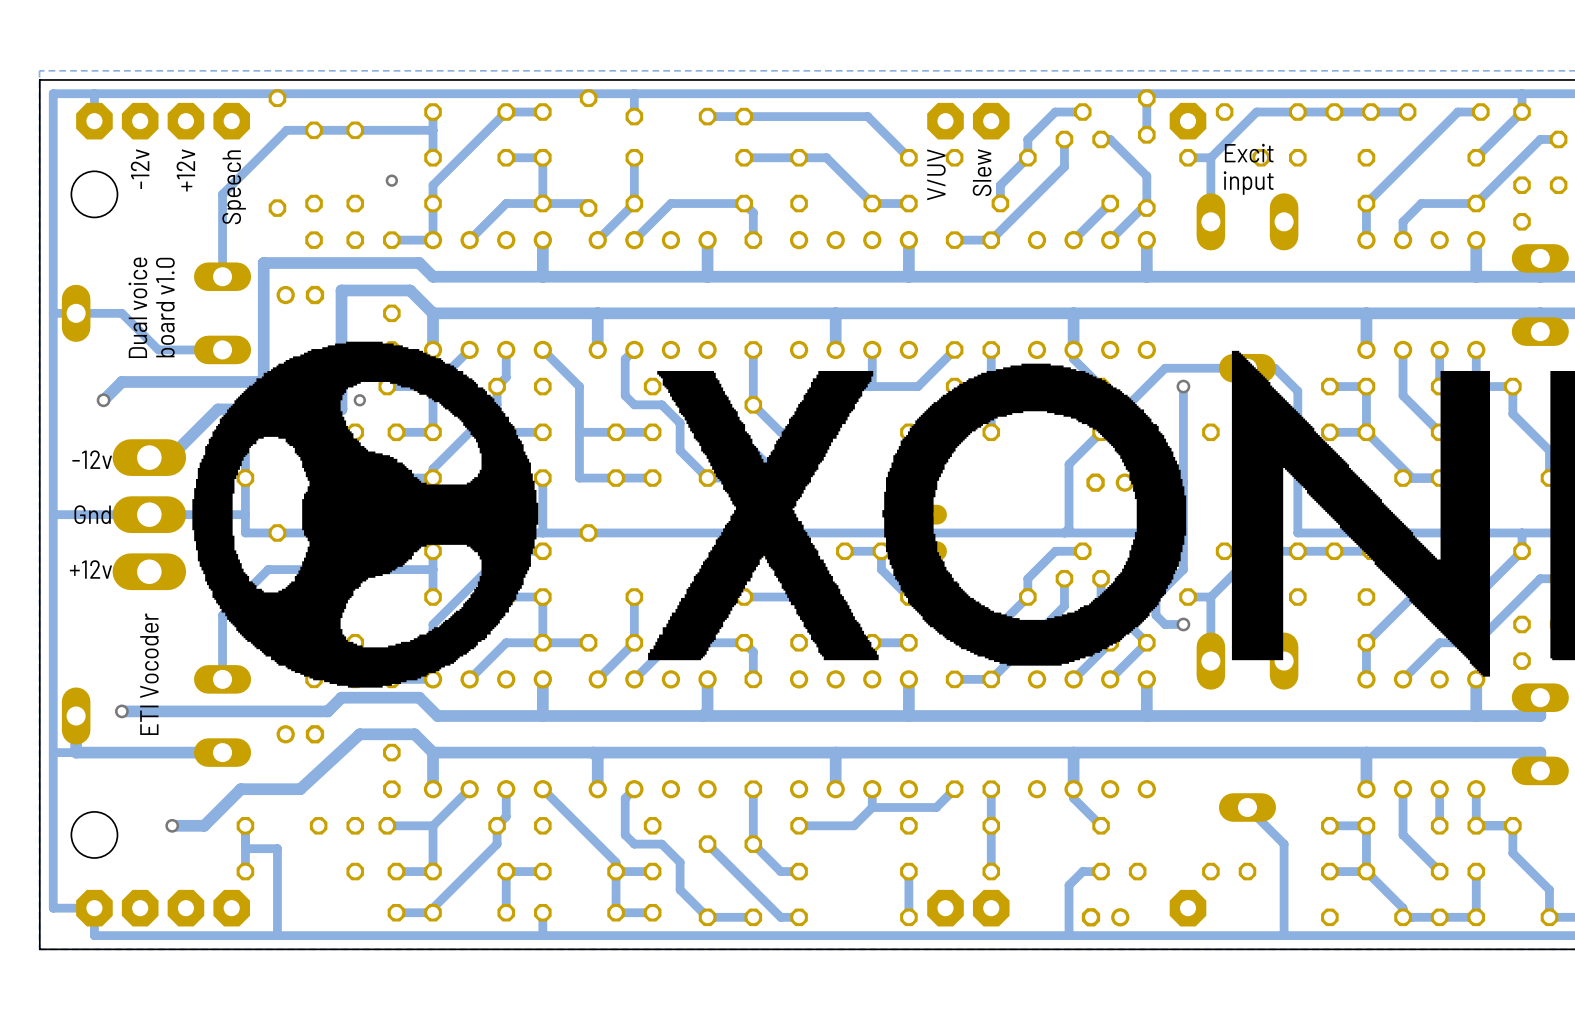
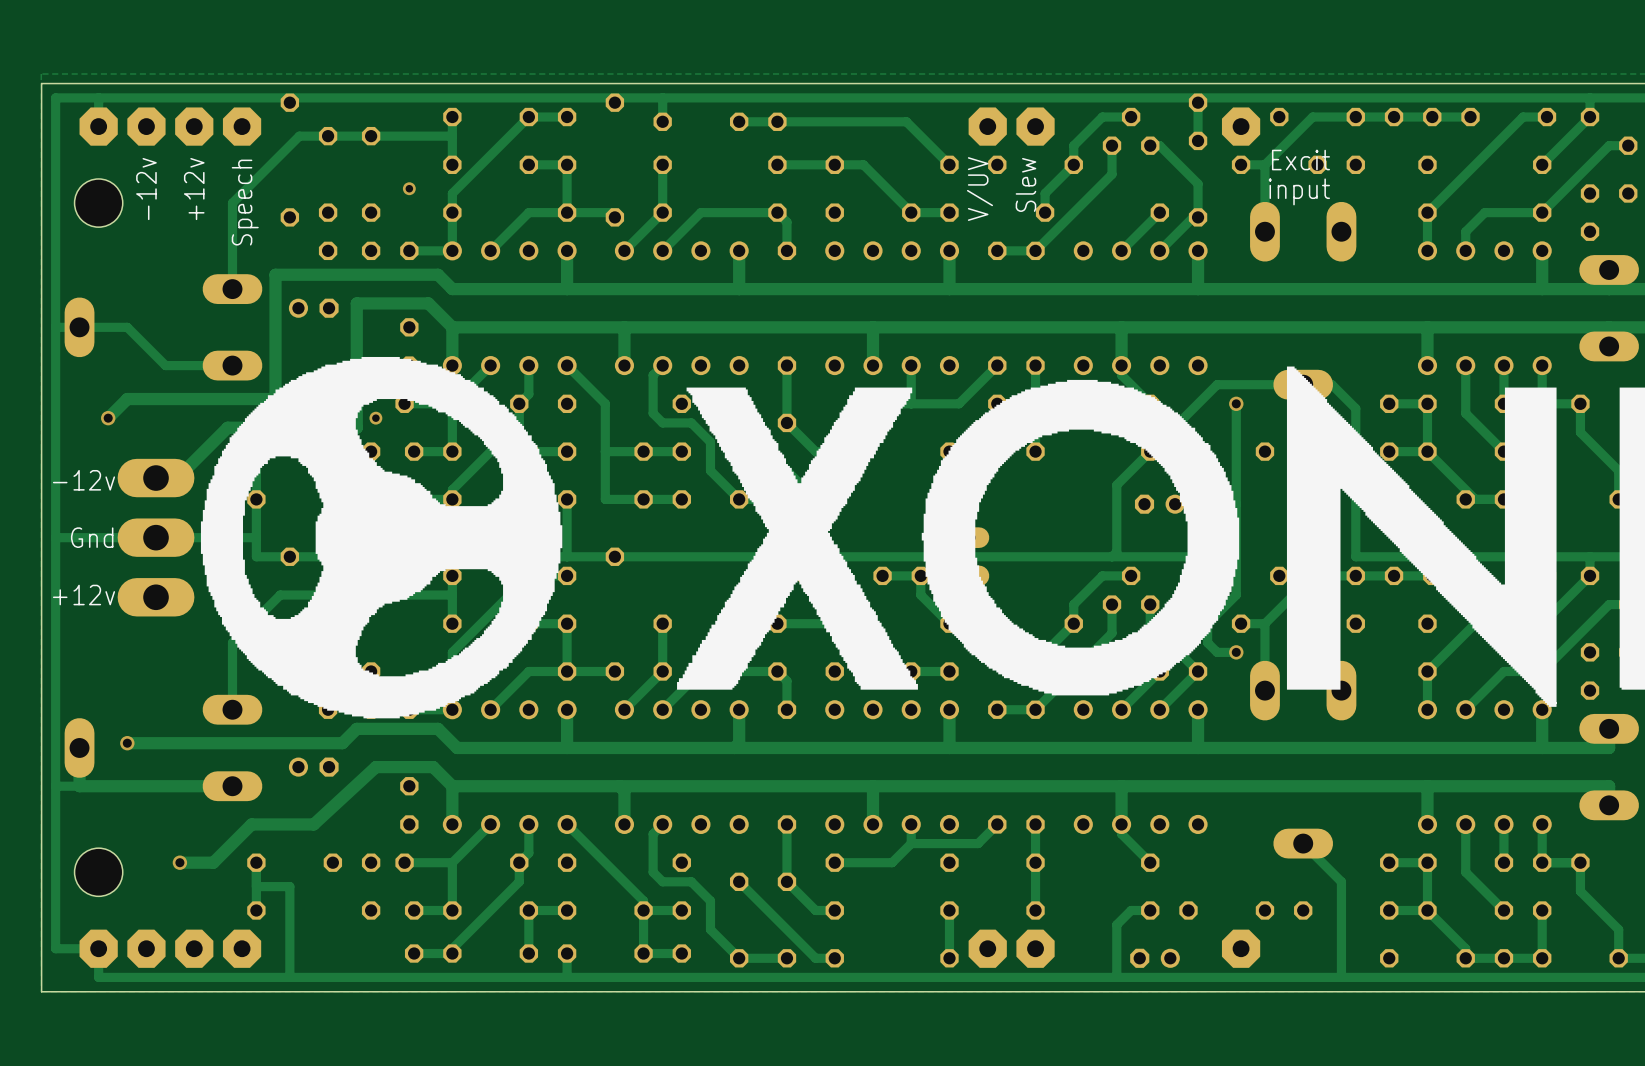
text: Dual voice (137, 307) -> none
text: board v1.0 (165, 307) -> none
text: ETI Vocoder (149, 674) -> none

